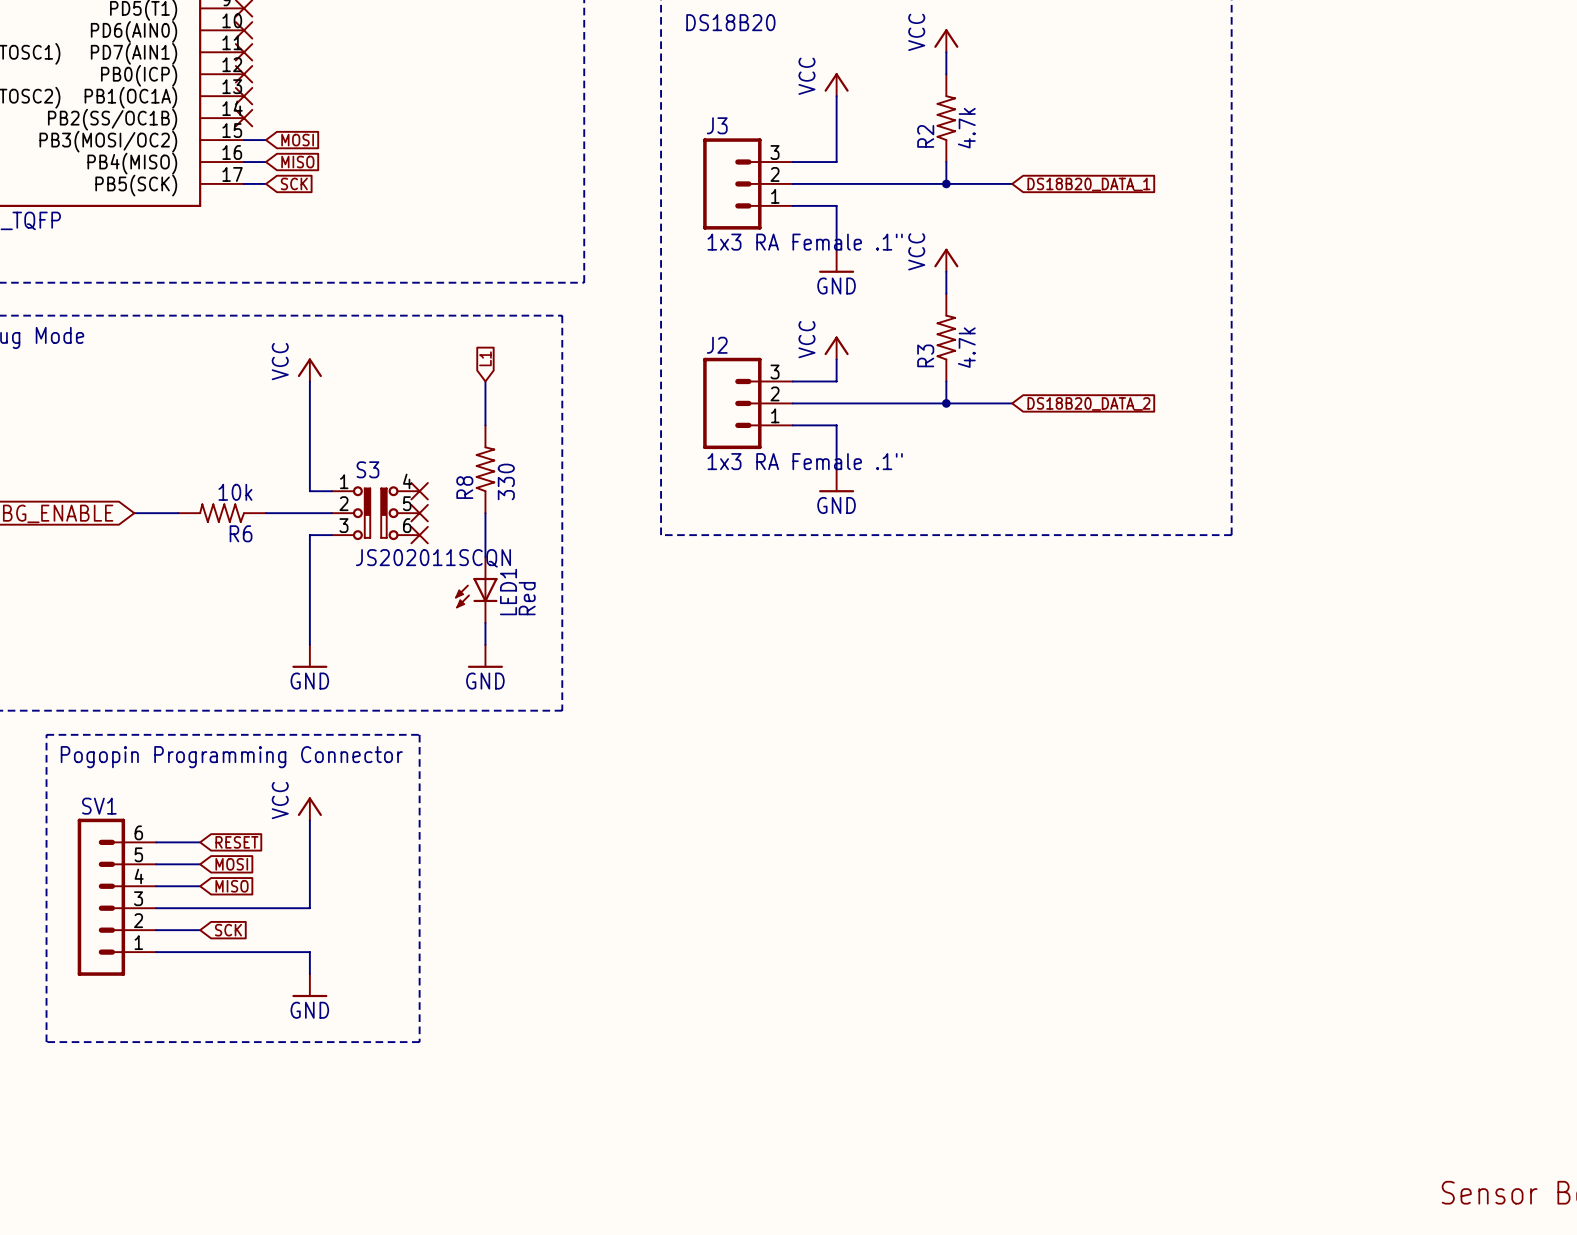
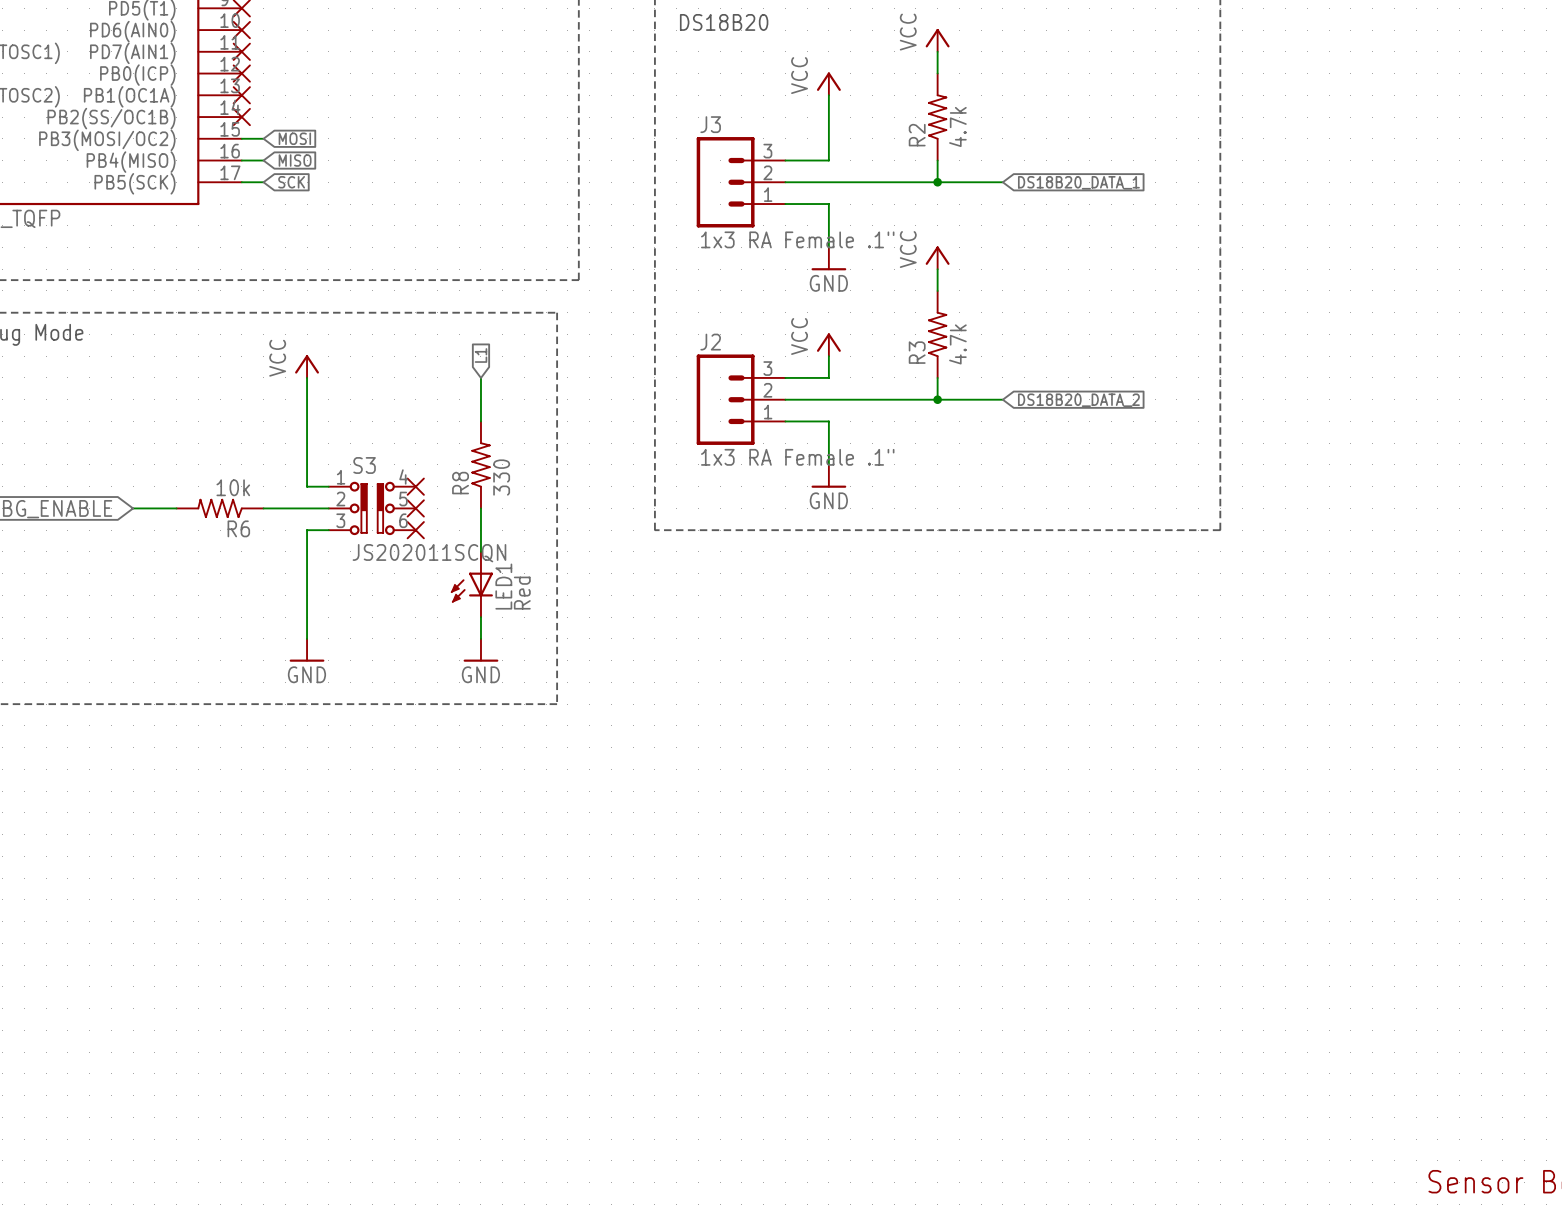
line: (46, 734) (46, 1042) (419, 1042) (419, 734) (46, 734) -> none
text: Pogopin Programming Connector (231, 757) -> none
power symbol: VCC (309, 808) -> none
wire: (309, 820) (309, 908) (156, 908) -> none
wire: (156, 842) (200, 842) -> none
global label: RESET (236, 842) -> none
wire: (156, 864) (200, 864) -> none
global label: MOSI (231, 864) -> none
wire: (156, 886) (200, 886) -> none
global label: MISO (232, 886) -> none
SV1: (116, 897) -> none
wire: (156, 930) (200, 930) -> none
global label: SCK (228, 930) -> none
wire: (156, 952) (309, 952) (309, 974) -> none
power symbol: GND (309, 985) -> none

